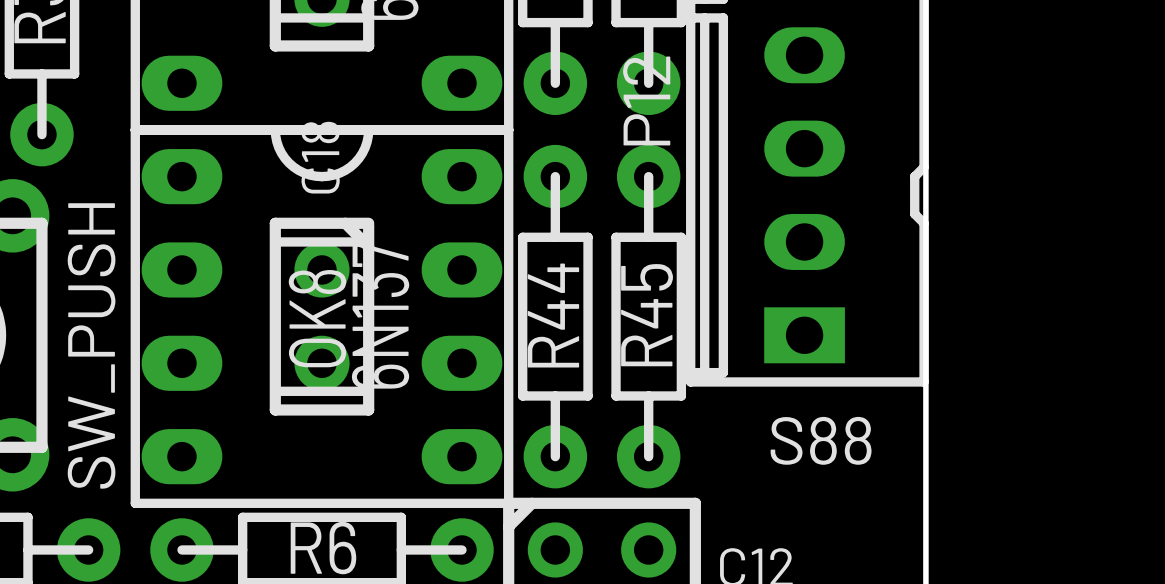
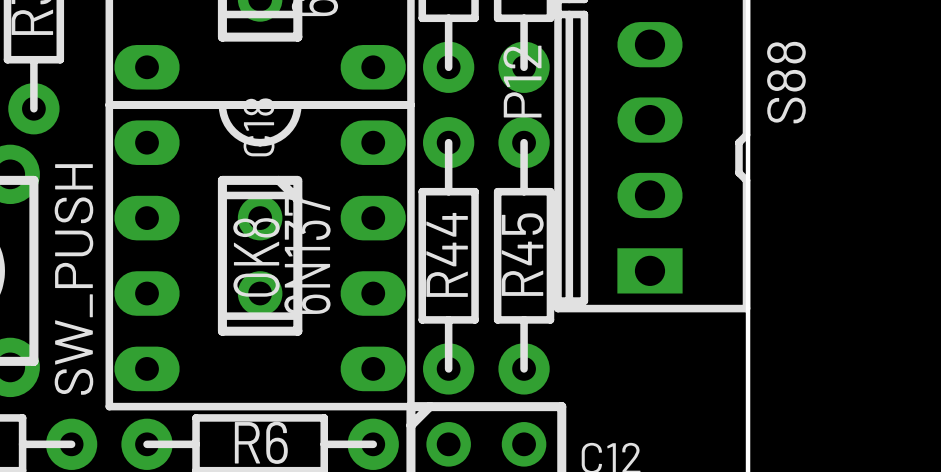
P12 value rotation: 0° (821, 440) -> 90° counterclockwise (786, 82)
P12 value position: S88 (821, 440) -> S88 (786, 82)

